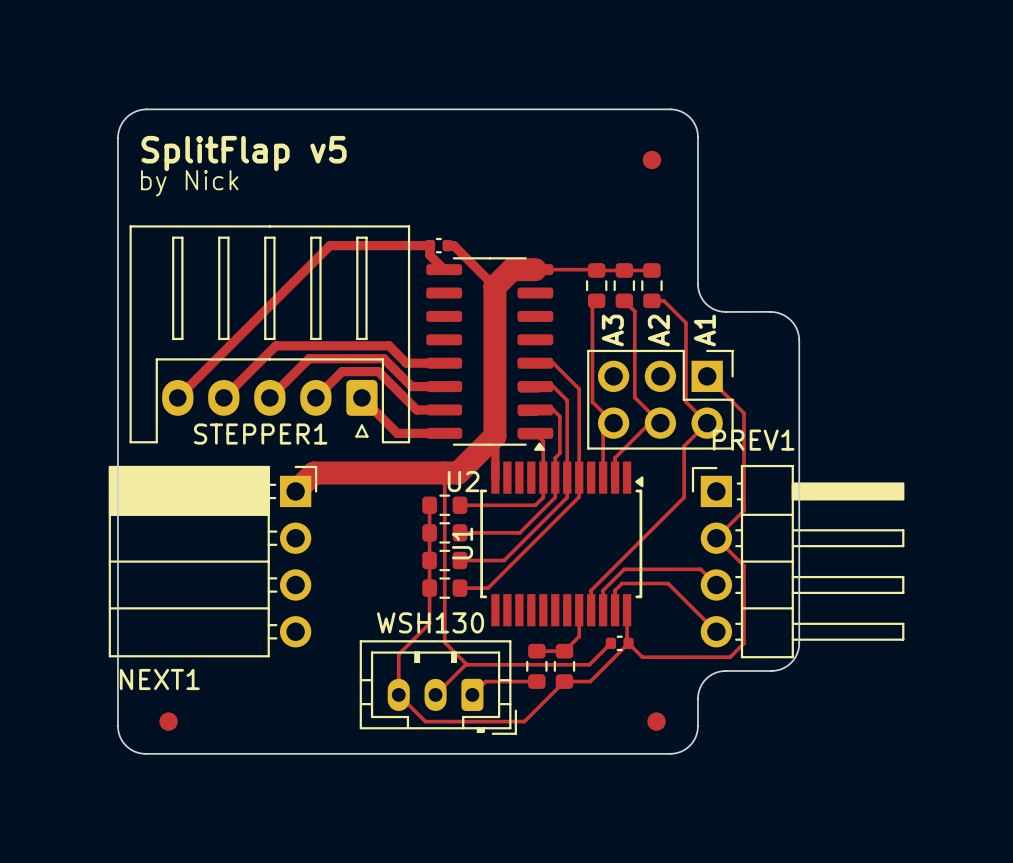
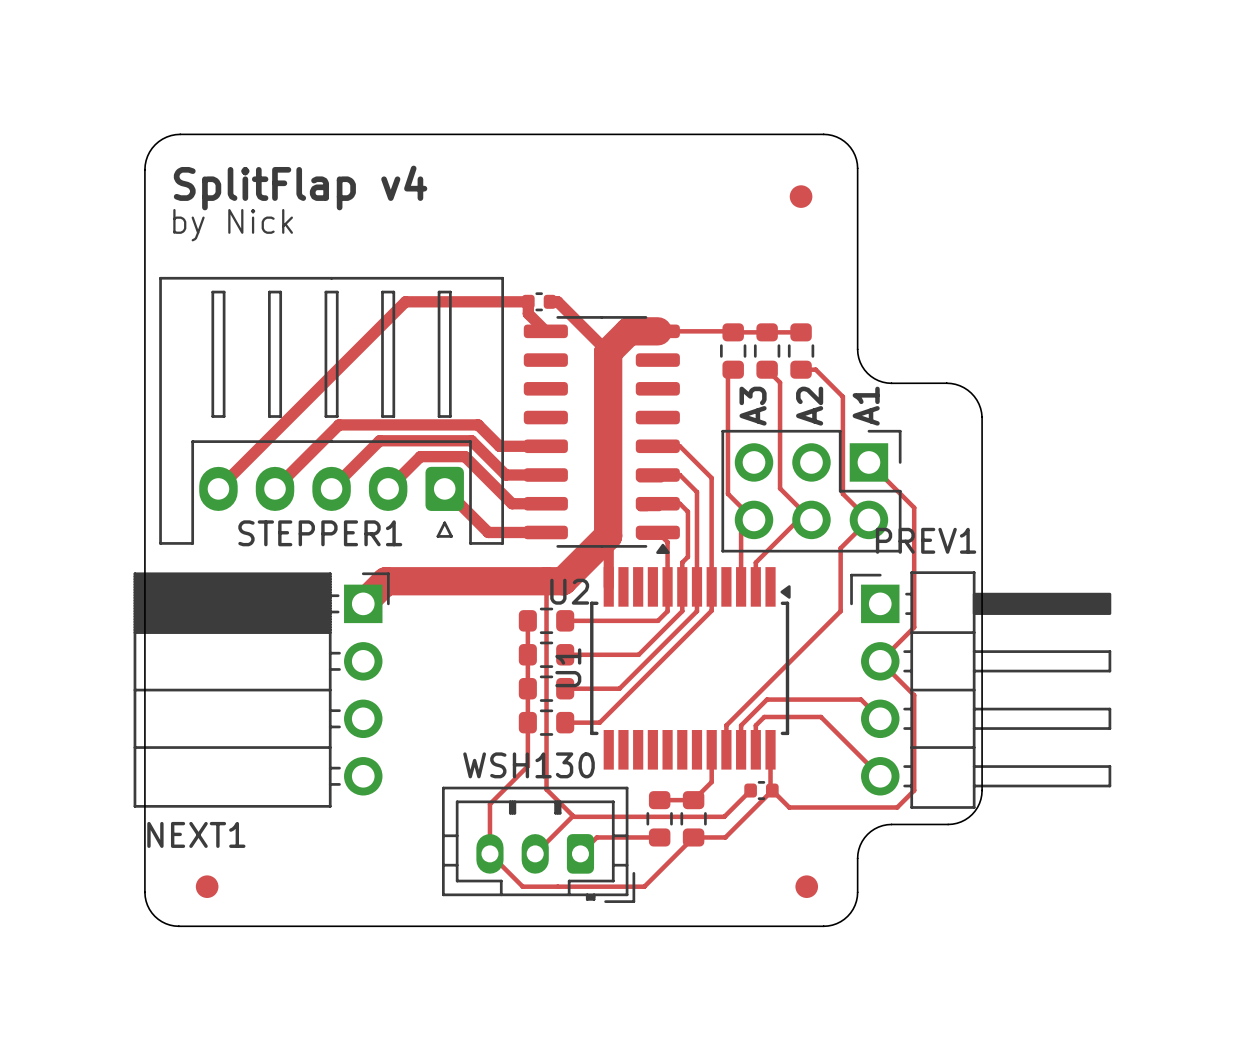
text: SplitFlap v5 (244, 153) -> SplitFlap v4 (300, 187)

